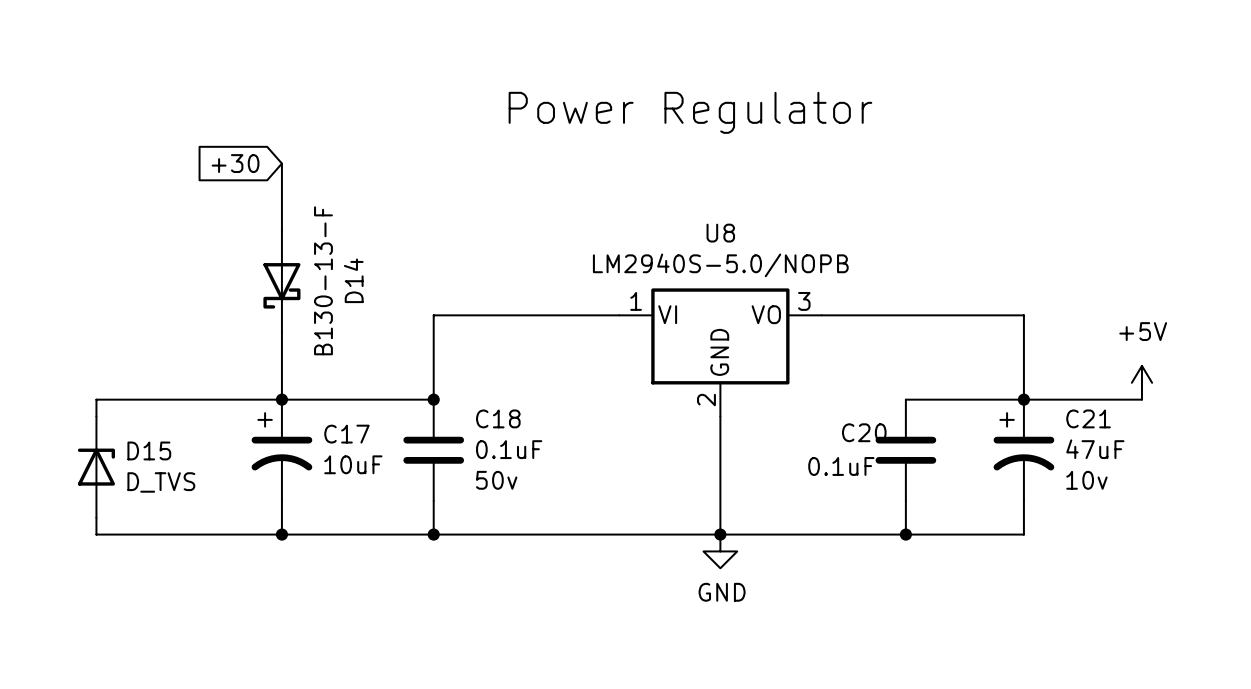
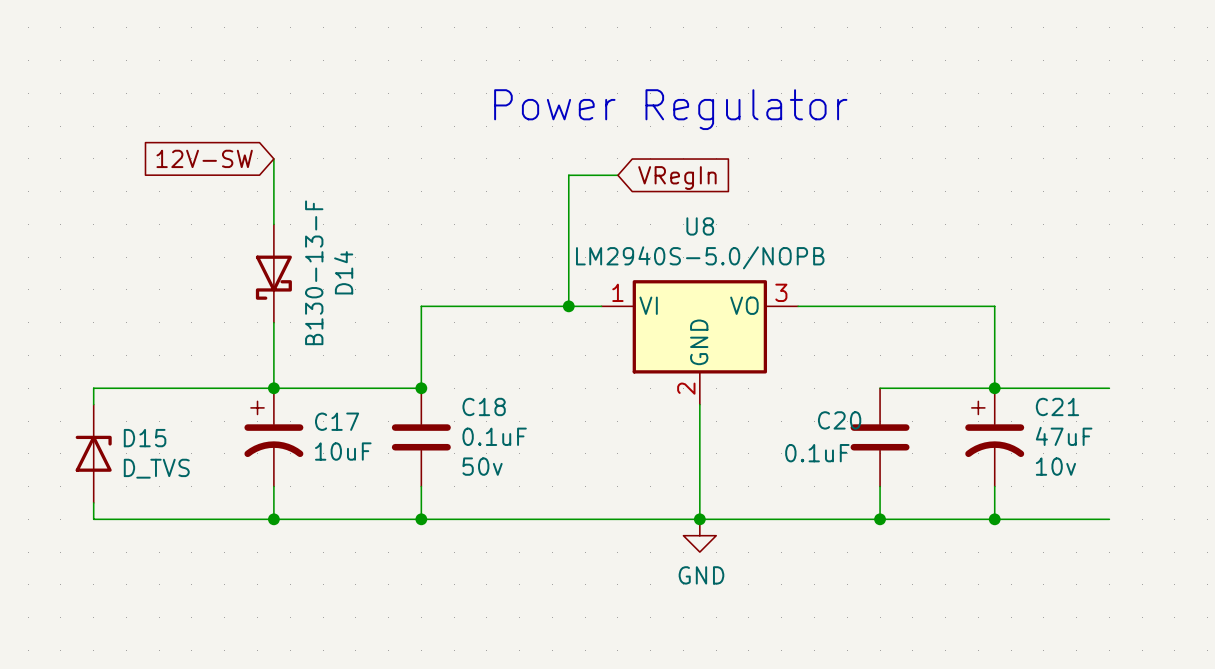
global label: +30 (235, 163) -> 12V-SW (204, 158)
wire: none -> (617, 175) (568, 175) (568, 306)
global label: none -> VRegIn (677, 178)
junction: none -> (568, 306)
power symbol: +5V (1141, 382) -> none
wire: none -> (994, 519) (1109, 519)
junction: none -> (994, 519)

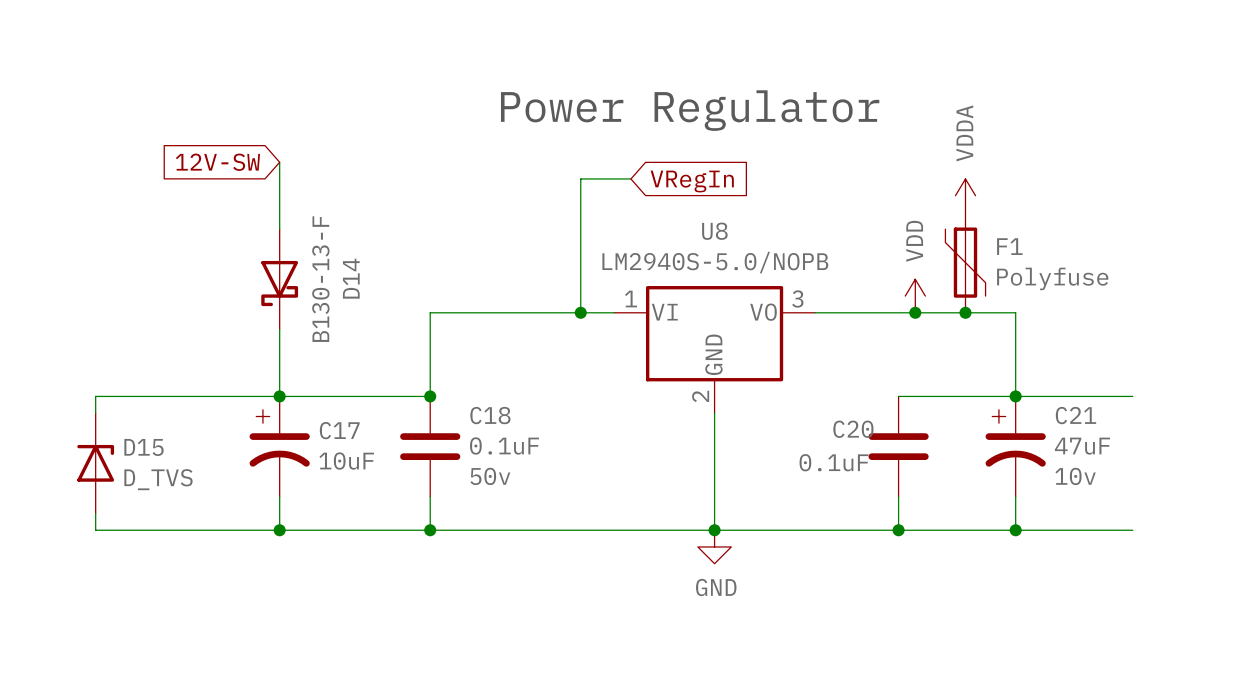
power symbol: none -> VDDA (965, 195)
F1: none -> Polyfuse (965, 262)
power symbol: none -> VDD (915, 296)
junction: none -> (915, 312)
junction: none -> (965, 312)

